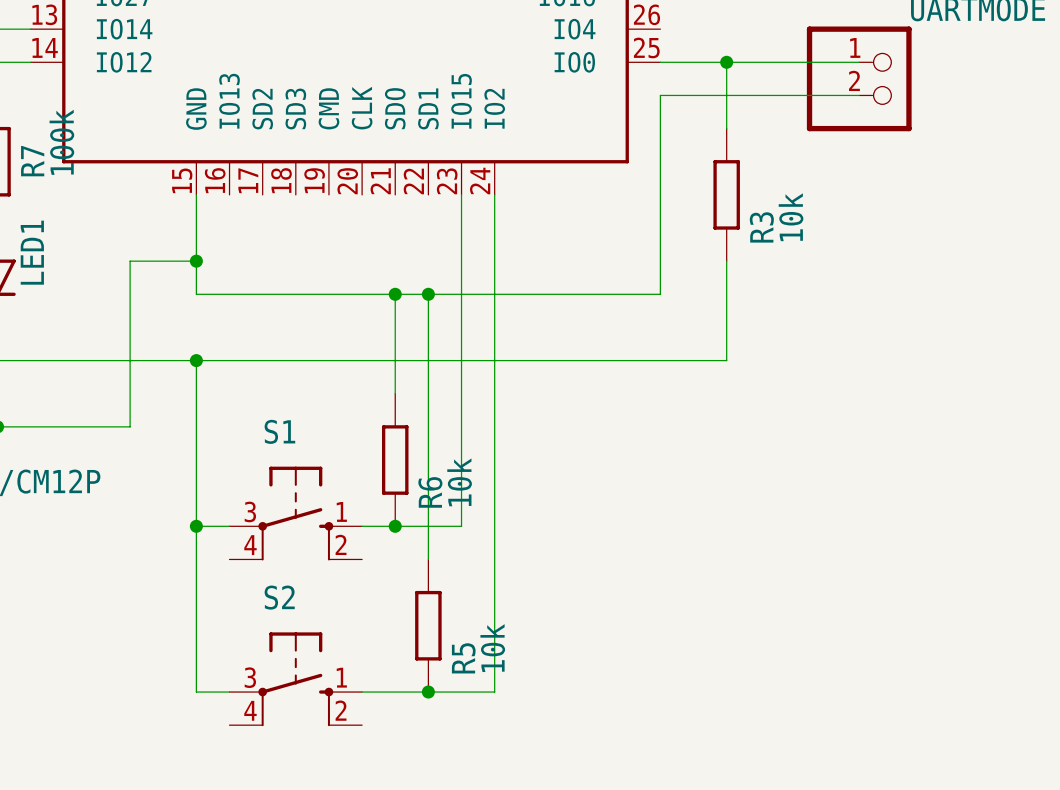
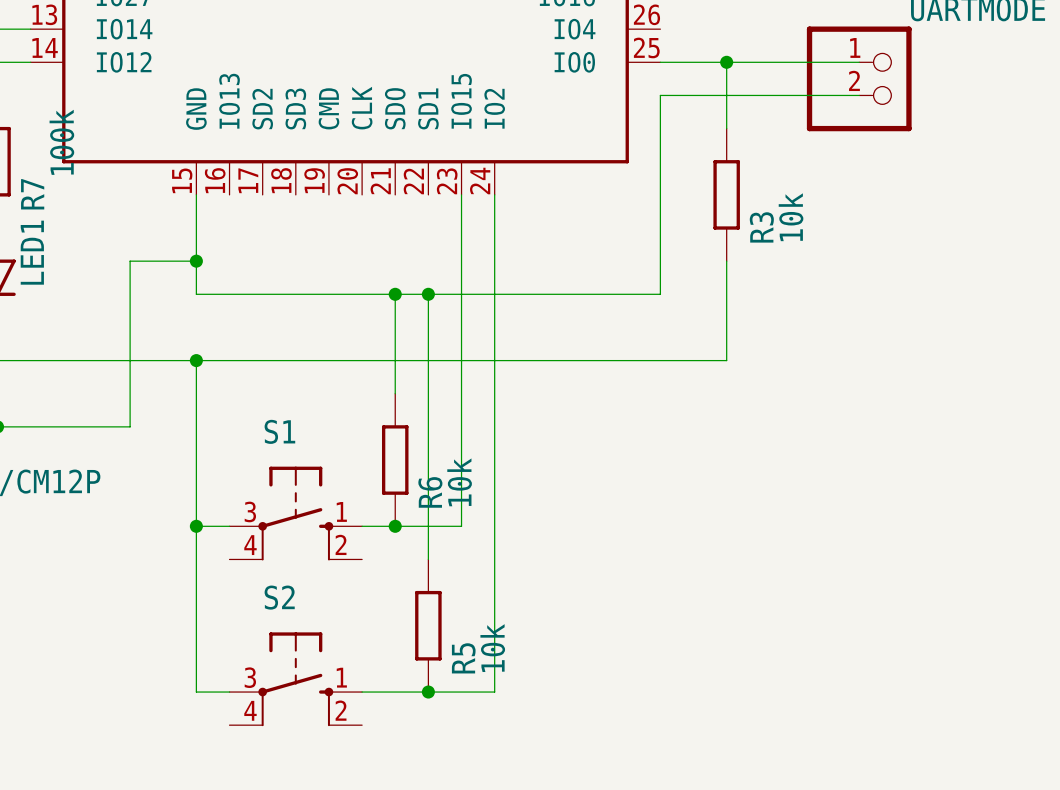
R7 name position: R7 (32, 161) -> R7 (32, 194)

